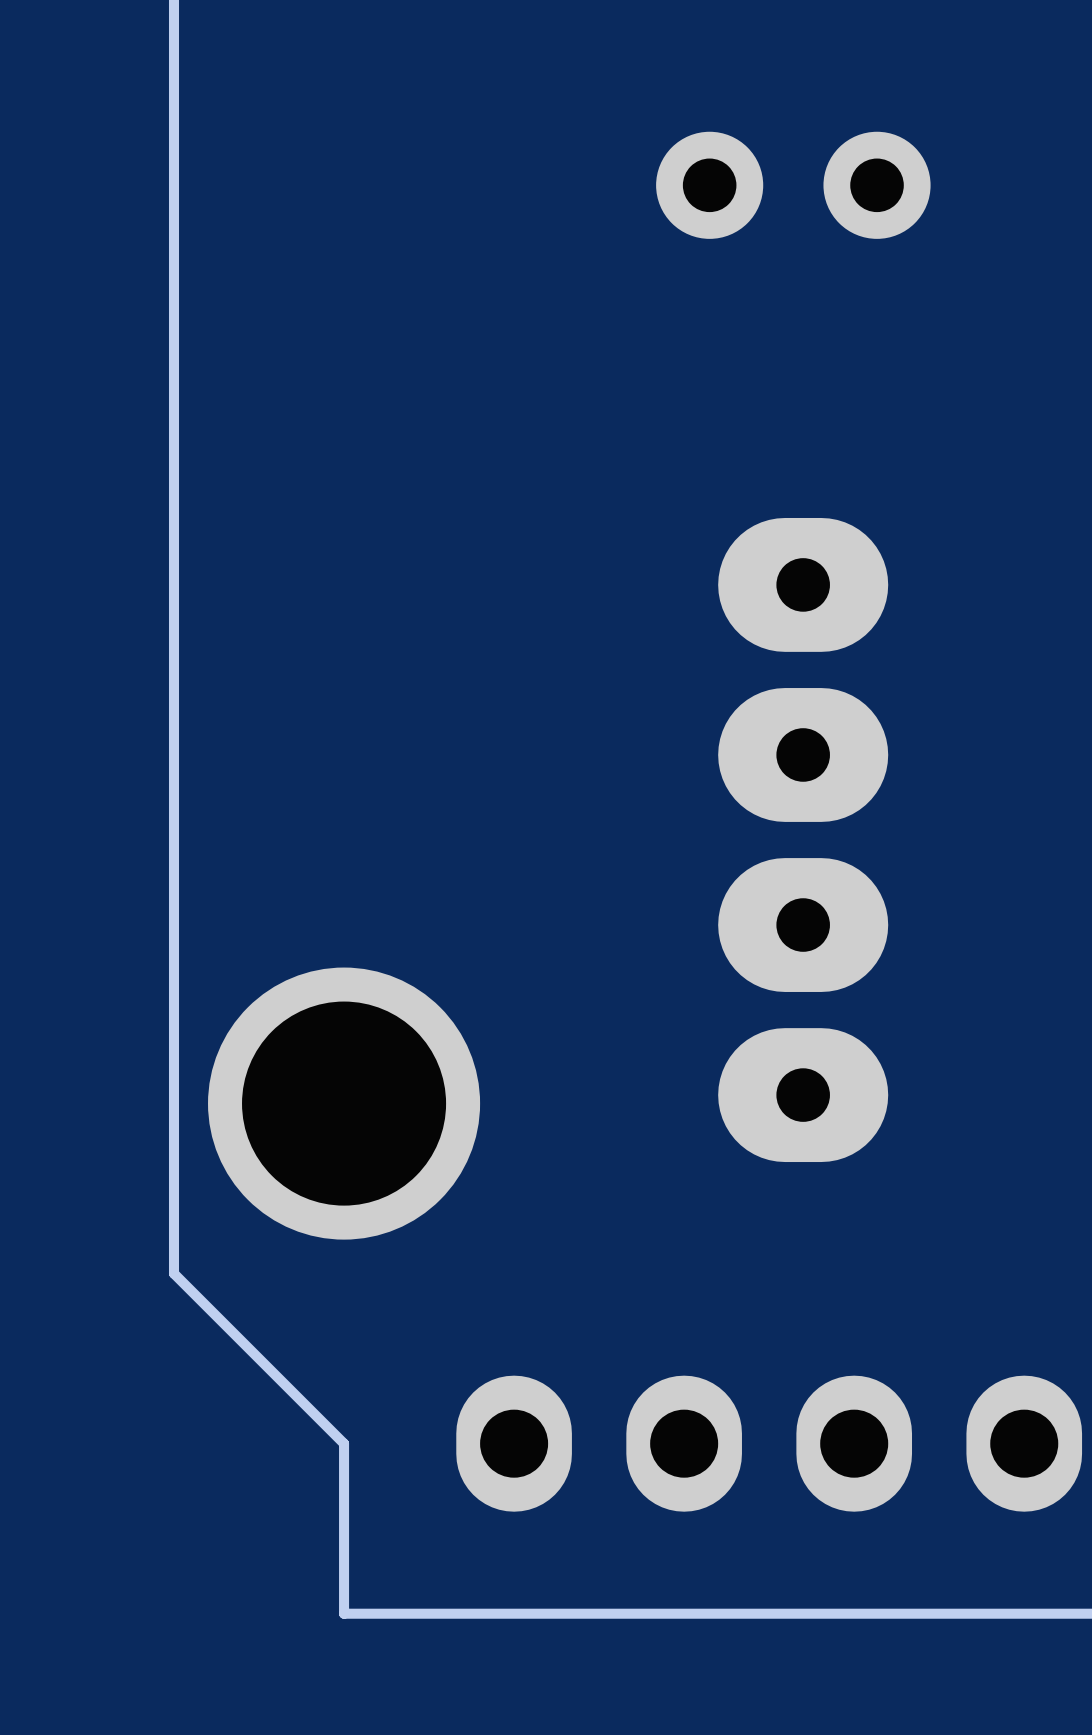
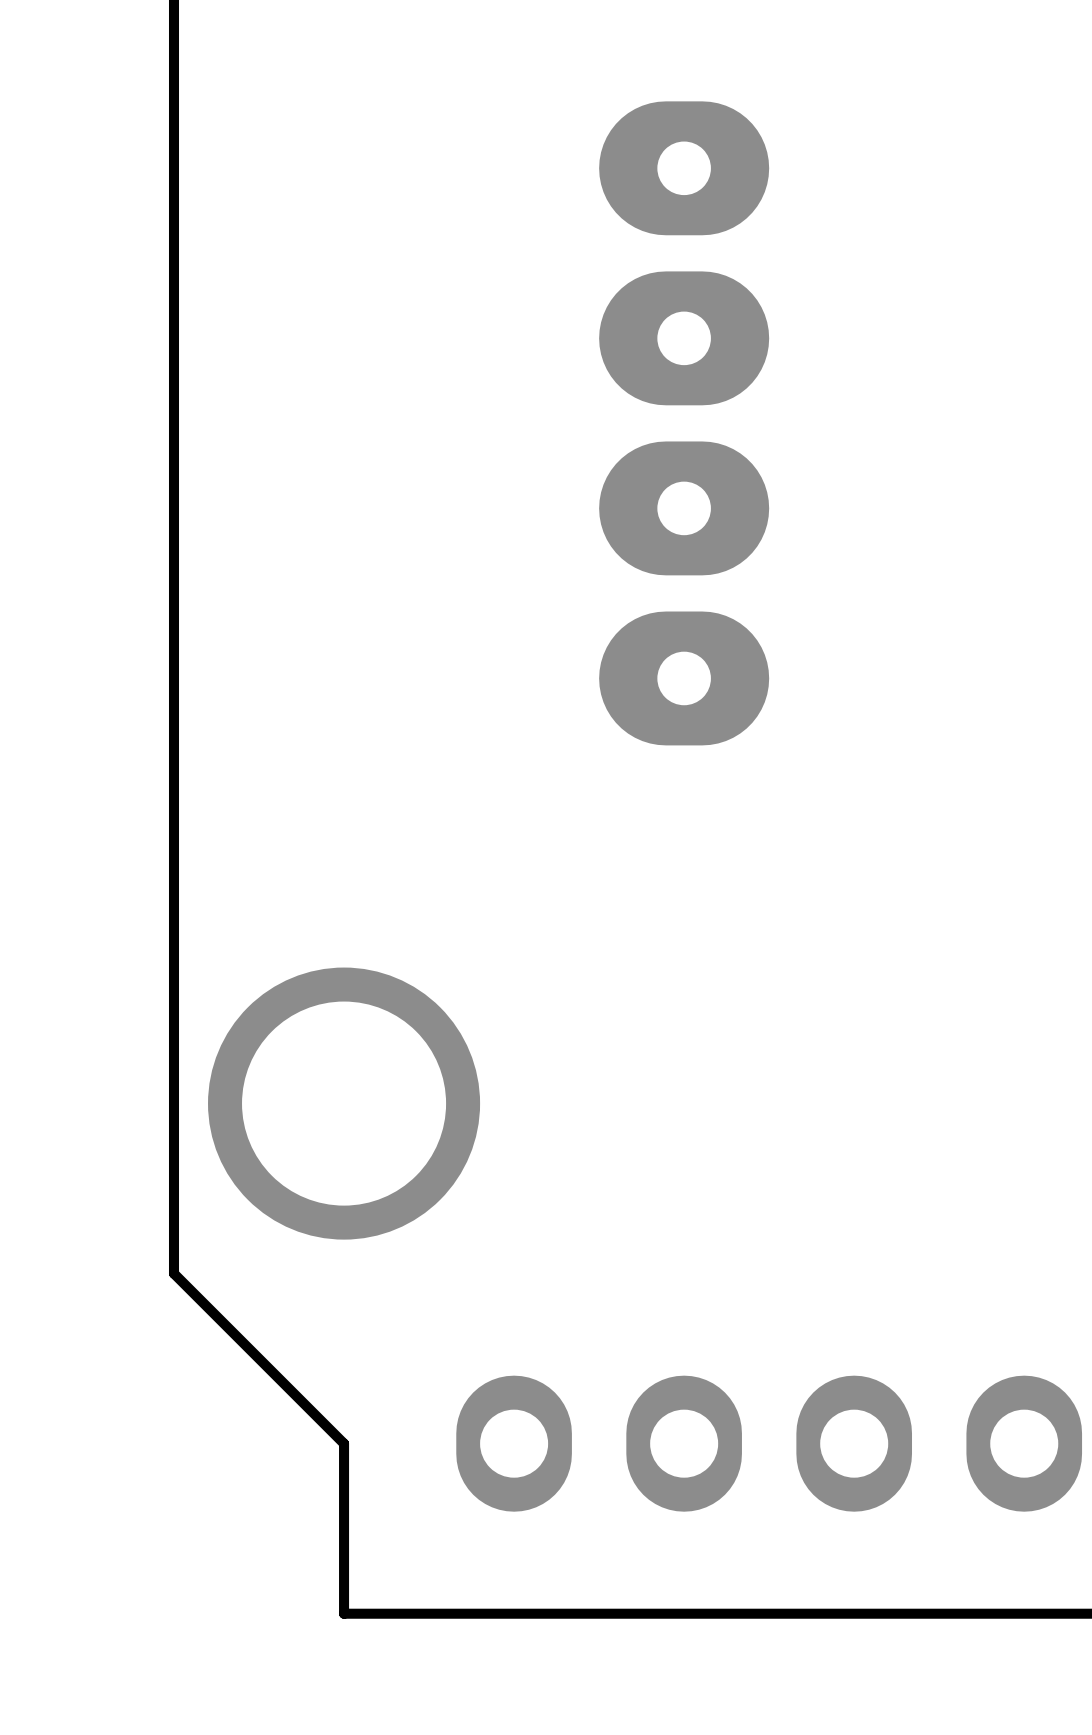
part: (793, 185) -> none
part position: (803, 840) -> (684, 423)

